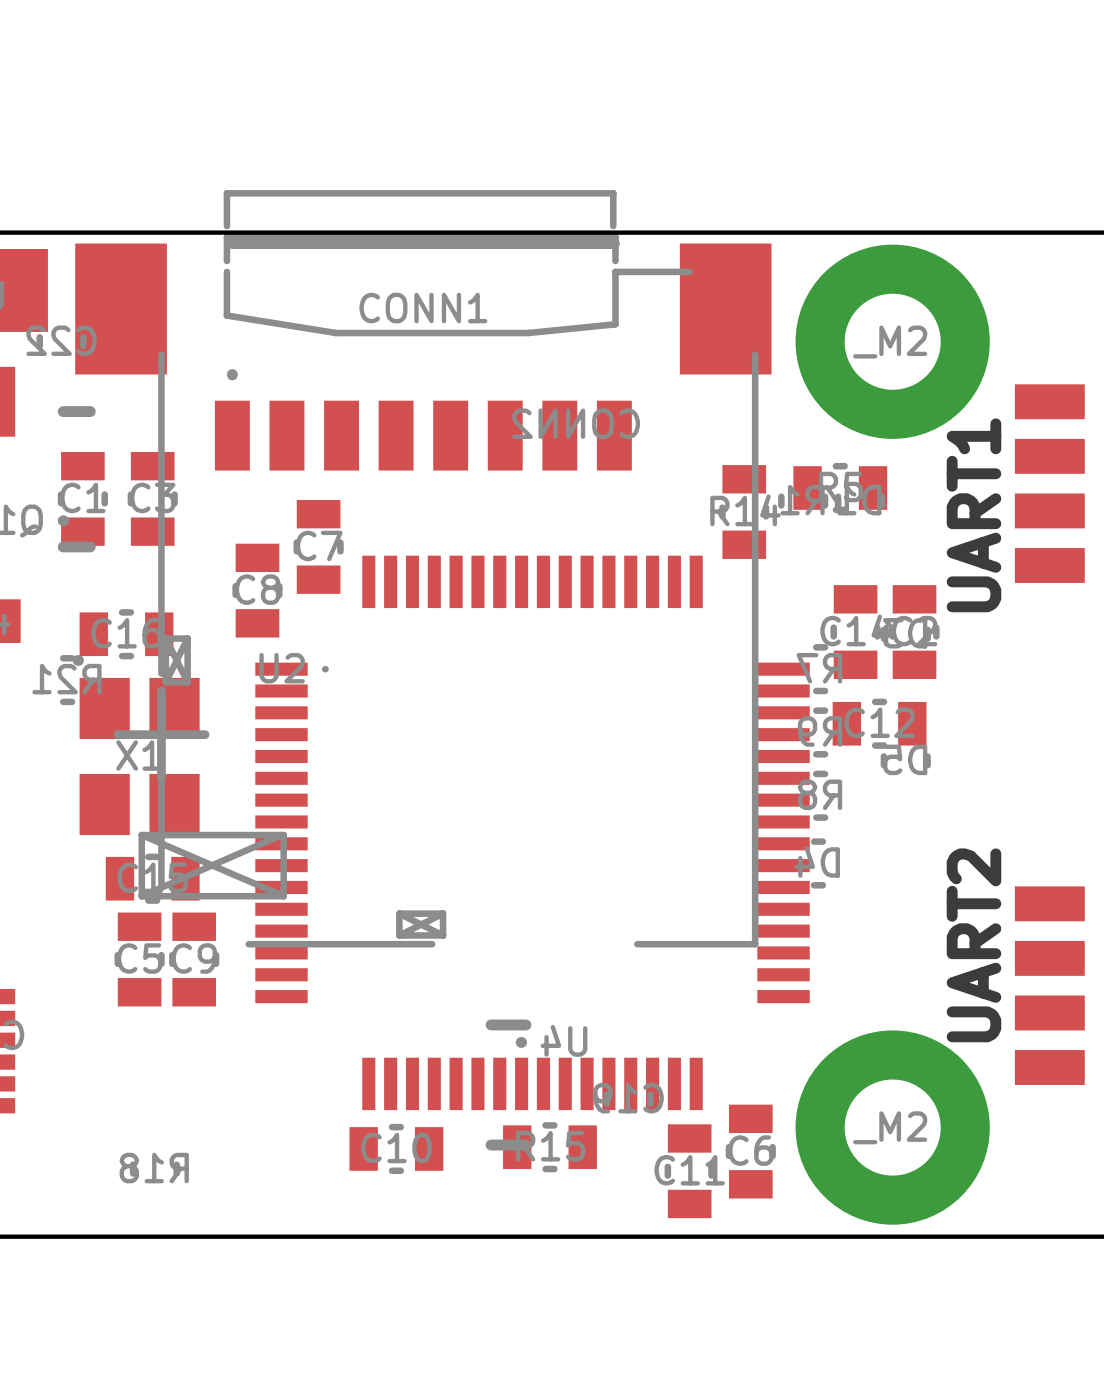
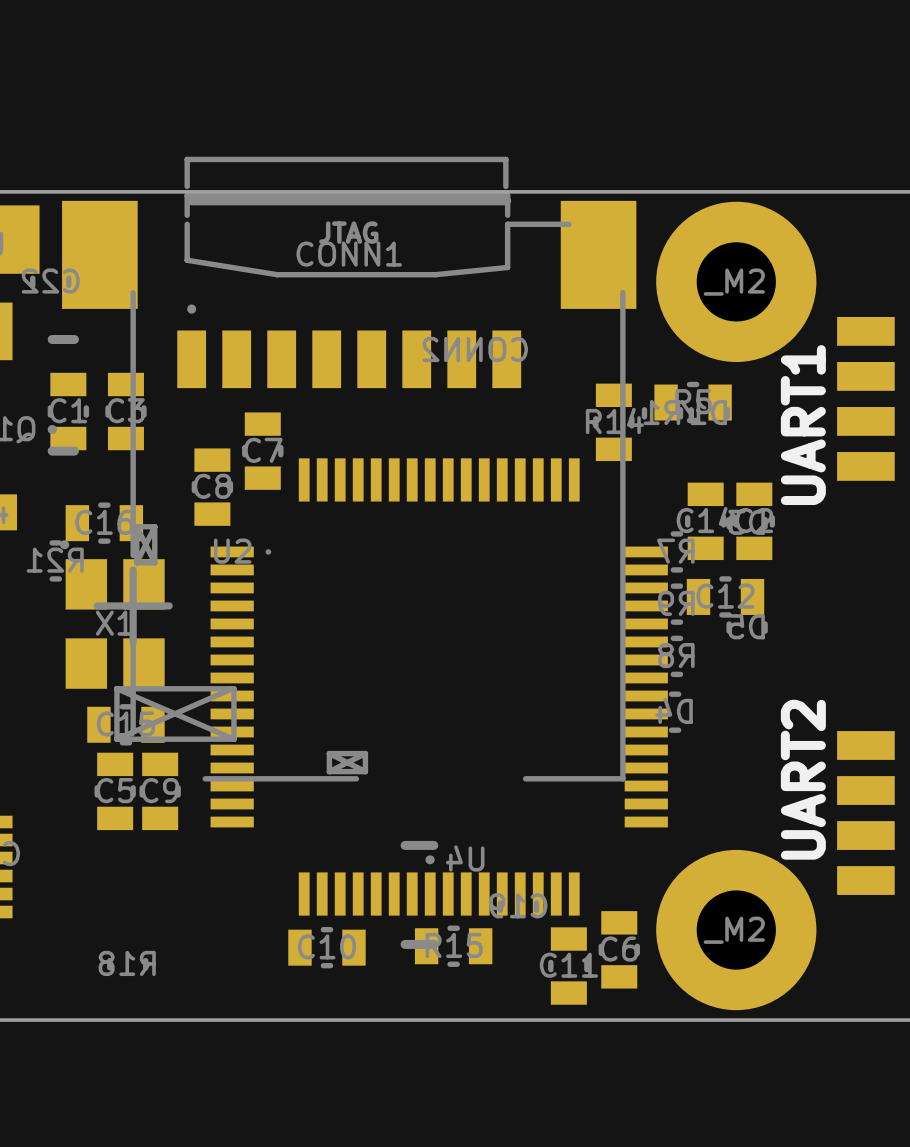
CONN1 value: none -> JTAG (348, 232)

